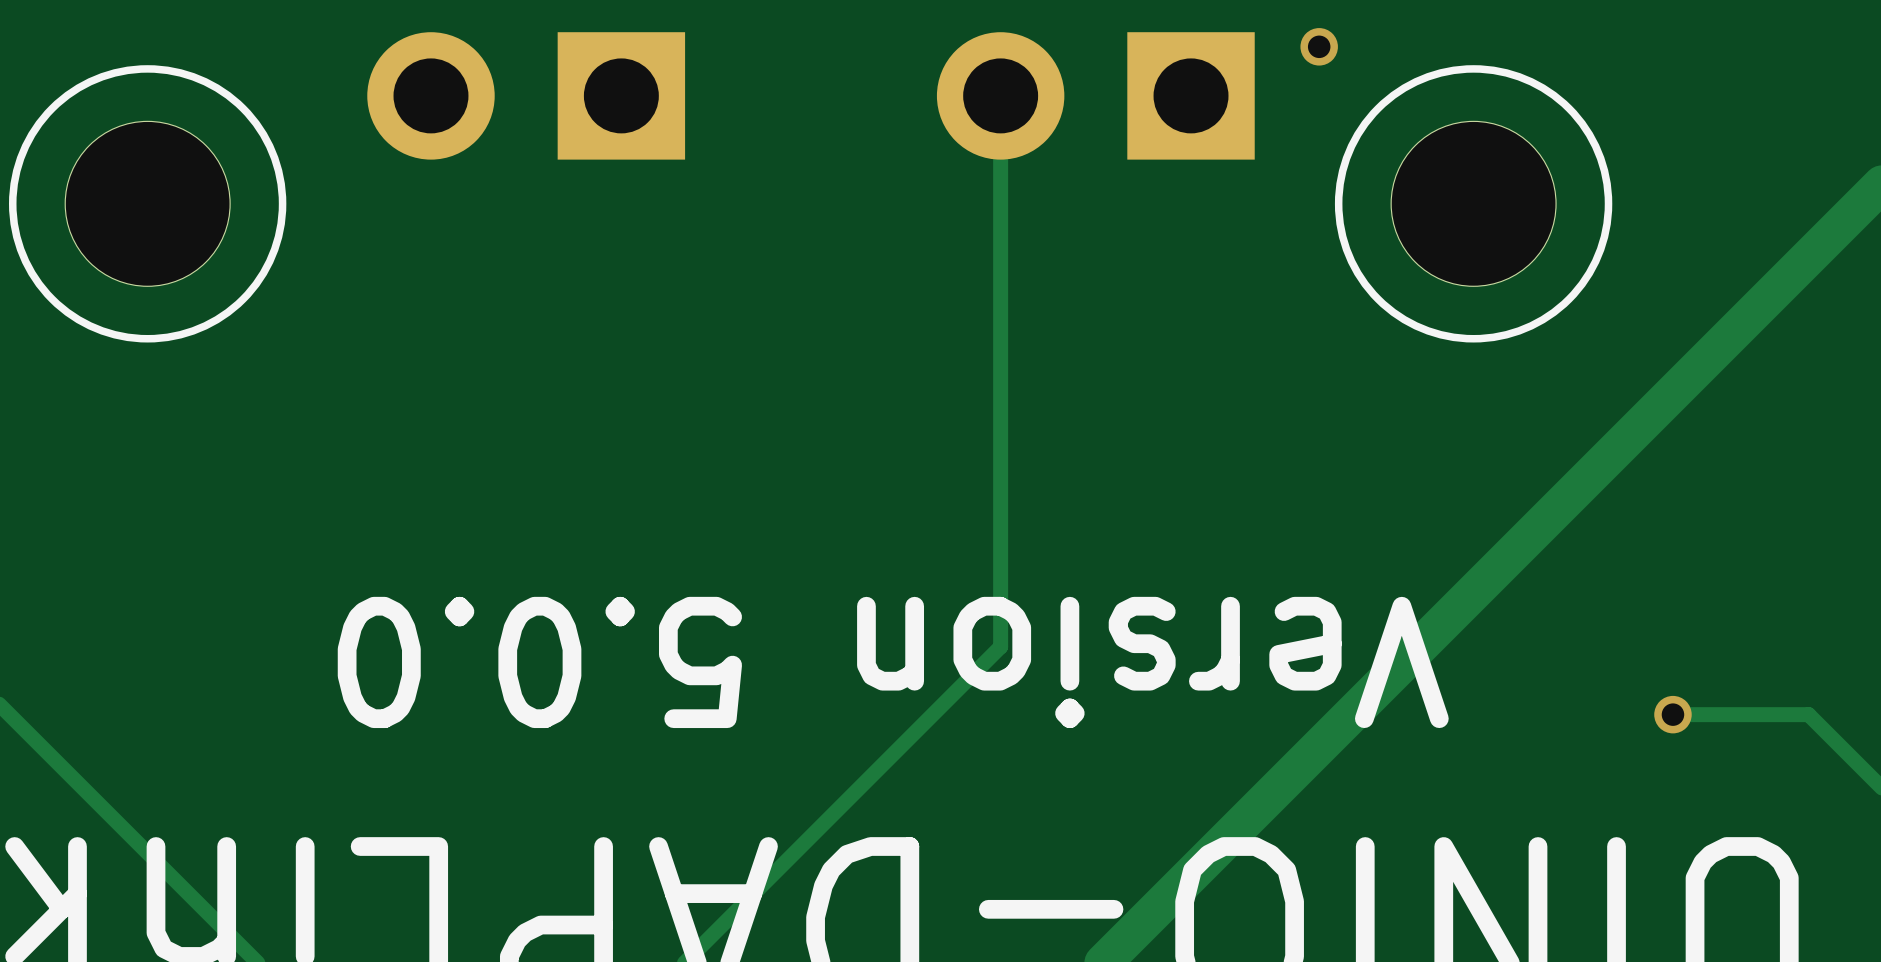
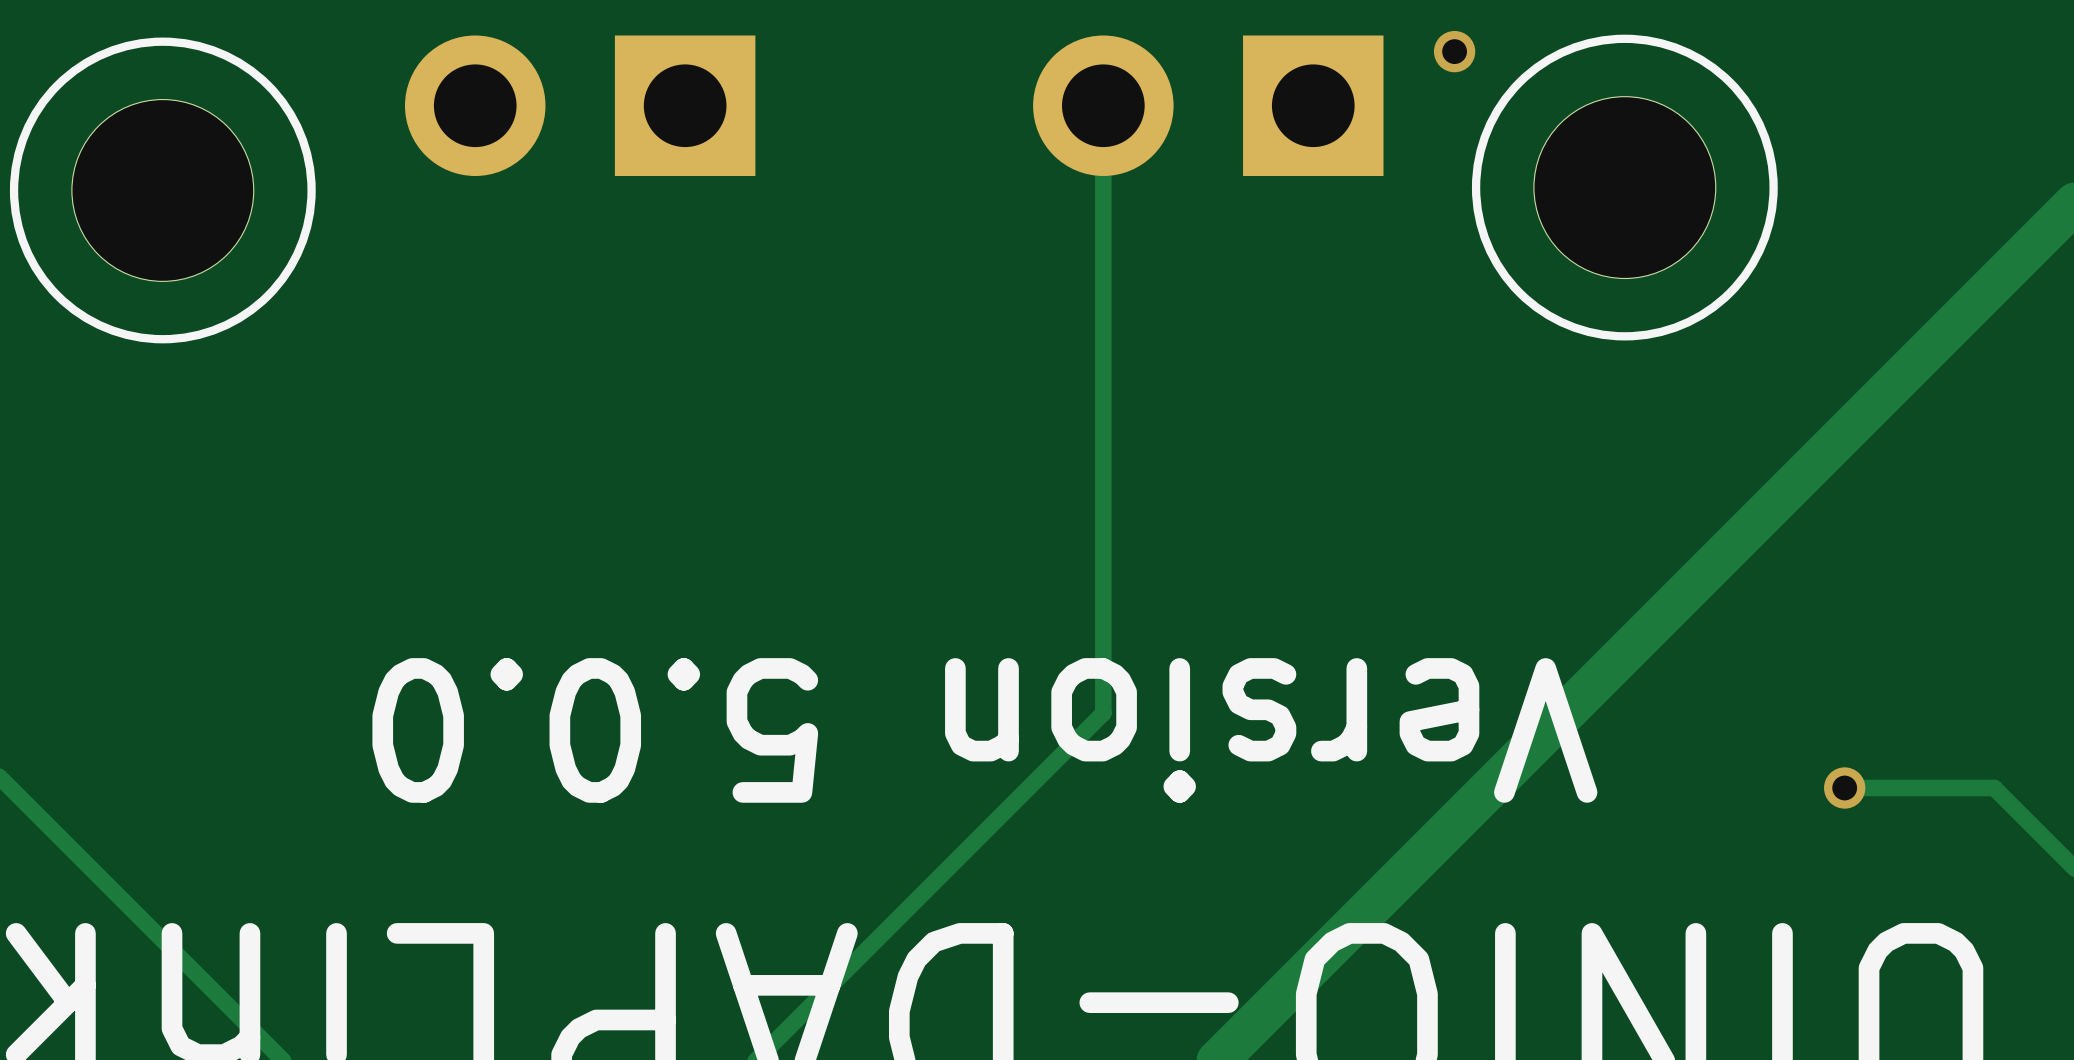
part position: (147, 203) -> (162, 190)
part position: (1473, 203) -> (1624, 187)

